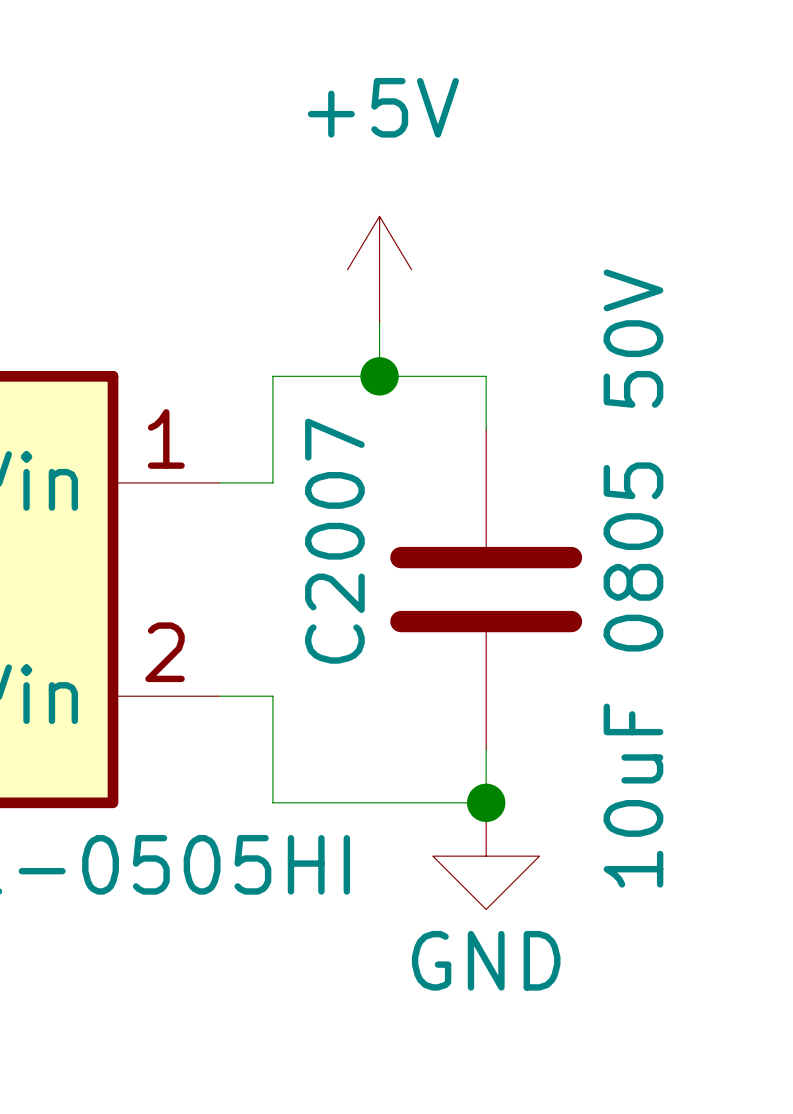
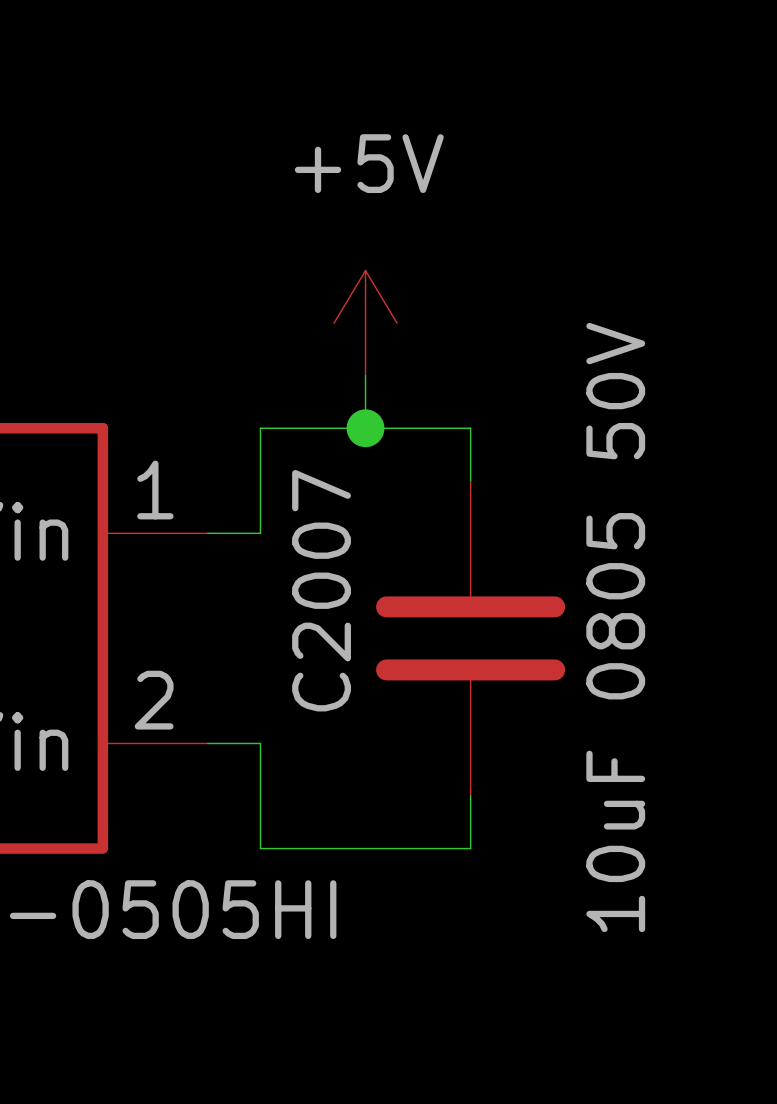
junction: (486, 802) -> none
power symbol: GND (486, 856) -> none

